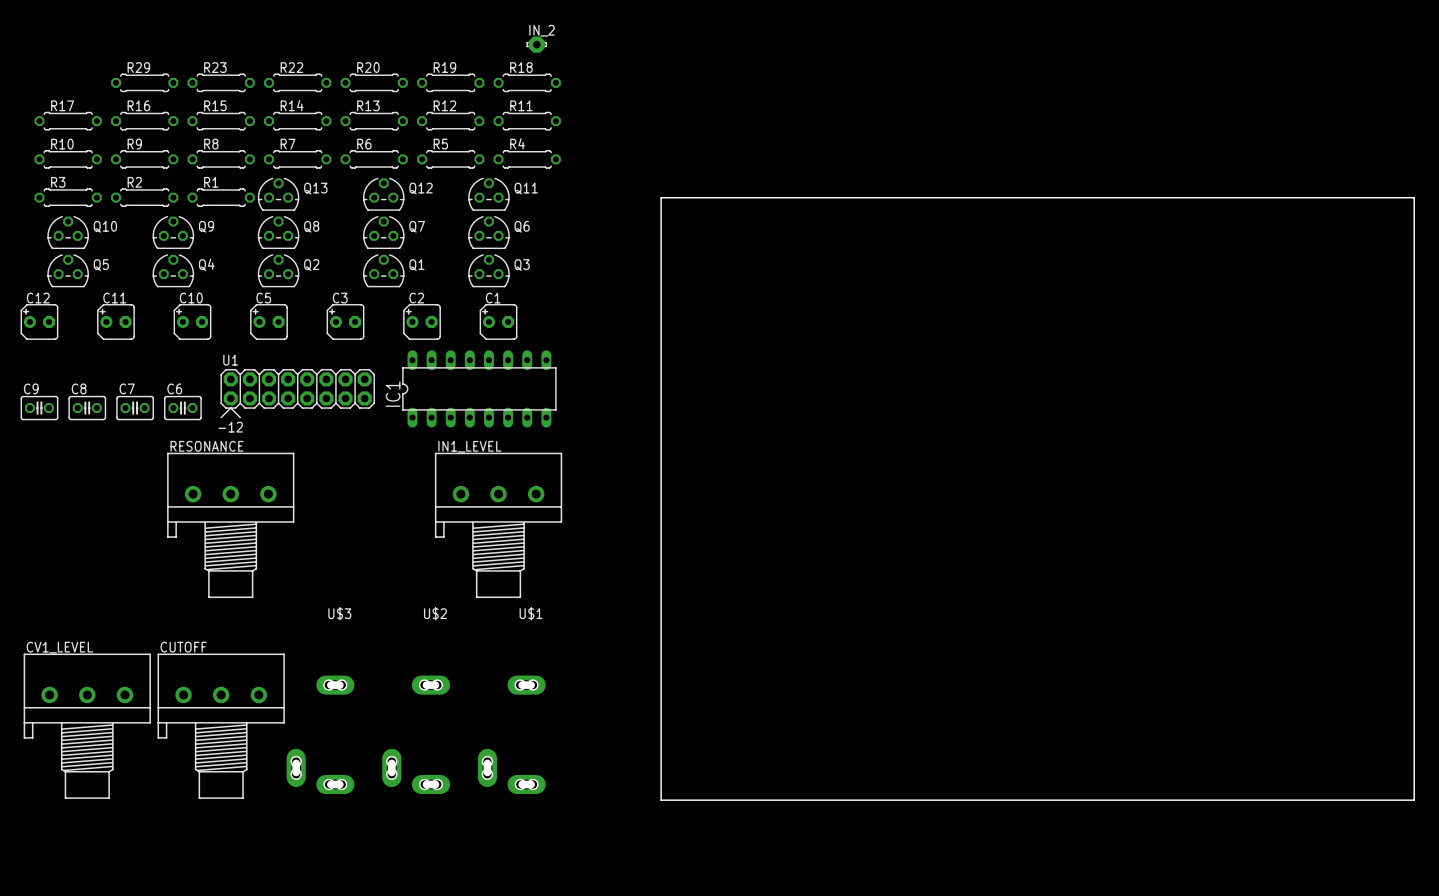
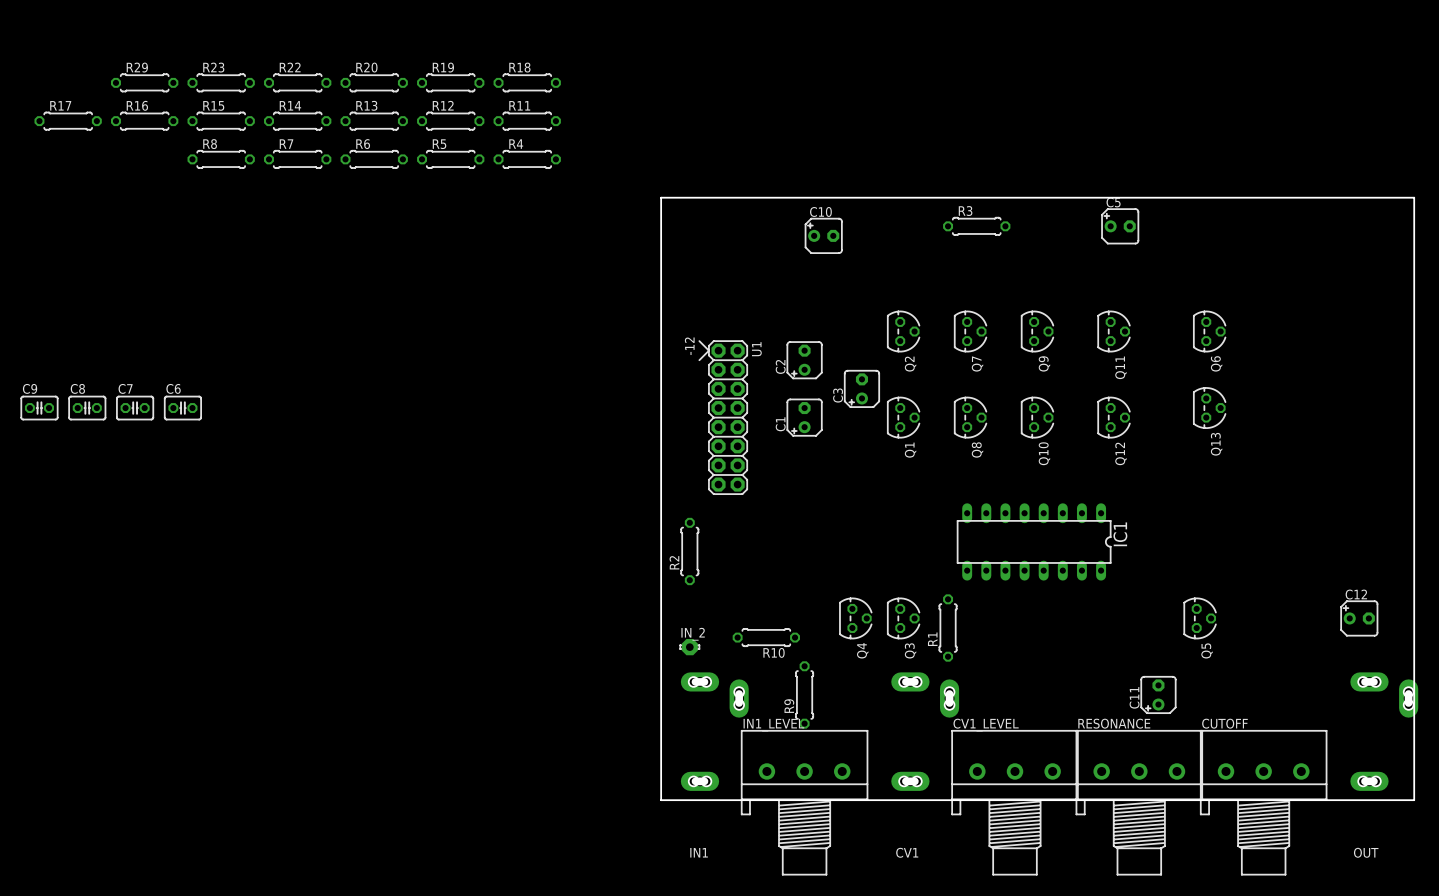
IN_2 position: (536, 44) -> (689, 647)
R10 name position: R10 (62, 144) -> R10 (774, 652)
R9 name position: R9 (134, 144) -> R9 (789, 706)
R10 position: (68, 159) -> (766, 637)
R9 rotation: 0° (144, 159) -> 90° clockwise (804, 694)
R9 position: (144, 159) -> (804, 694)
R2 name position: R2 (134, 182) -> R2 (674, 562)
R1 name position: R1 (211, 182) -> R1 (932, 639)
Q13 rotation: 0° (278, 194) -> 90° clockwise (1209, 408)
Q13 position: (278, 194) -> (1209, 408)
Q12 rotation: 0° (383, 194) -> 90° clockwise (1114, 417)
Q12 position: (383, 194) -> (1114, 417)
Q11 rotation: 0° (488, 194) -> 90° clockwise (1114, 331)
Q11 position: (488, 194) -> (1114, 331)
R3 position: (68, 197) -> (976, 226)
R2 rotation: 0° (144, 197) -> 90° clockwise (689, 551)
R2 position: (144, 197) -> (689, 551)
R1 rotation: 0° (221, 197) -> 90° clockwise (948, 628)
R1 position: (221, 197) -> (948, 628)
Q10 rotation: 0° (68, 232) -> 90° clockwise (1037, 417)
Q10 position: (68, 232) -> (1037, 417)
Q9 rotation: 0° (173, 232) -> 90° clockwise (1037, 331)
Q9 position: (173, 232) -> (1037, 331)
Q8 rotation: 0° (278, 232) -> 90° clockwise (970, 417)
Q8 position: (278, 232) -> (970, 417)
Q7 rotation: 0° (383, 232) -> 90° clockwise (970, 331)
Q7 position: (383, 232) -> (970, 331)
Q6 rotation: 0° (488, 232) -> 90° clockwise (1209, 331)
Q6 position: (488, 232) -> (1209, 331)
Q5 rotation: 0° (68, 270) -> 90° clockwise (1200, 618)
Q5 position: (68, 270) -> (1200, 618)
Q4 rotation: 0° (173, 270) -> 90° clockwise (855, 618)
Q4 position: (173, 270) -> (855, 618)
Q2 rotation: 0° (278, 270) -> 90° clockwise (903, 331)
Q2 position: (278, 270) -> (903, 331)
Q1 rotation: 0° (383, 270) -> 90° clockwise (903, 417)
Q1 position: (383, 270) -> (903, 417)
Q3 rotation: 0° (488, 270) -> 90° clockwise (903, 618)
Q3 position: (488, 270) -> (903, 618)
C12 position: (39, 321) -> (1359, 618)
C11 rotation: 0° (115, 321) -> 90° counterclockwise (1158, 694)
C11 position: (115, 321) -> (1158, 694)
C10 position: (192, 321) -> (823, 235)
C5 position: (269, 321) -> (1120, 226)
C3 rotation: 0° (345, 321) -> 90° counterclockwise (861, 388)
C3 position: (345, 321) -> (861, 388)
C2 rotation: 0° (422, 321) -> 90° counterclockwise (804, 360)
C2 position: (422, 321) -> (804, 360)
C1 rotation: 0° (498, 321) -> 90° counterclockwise (804, 417)
C1 position: (498, 321) -> (804, 417)
U1 name position: U1 (230, 360) -> U1 (756, 349)
U1 footprint: [220, 369, 375, 419] -> [698, 340, 748, 495]
IC1 rotation: 0° (479, 388) -> 180° (1034, 541)
IC1 position: (479, 388) -> (1034, 541)
RESONANCE: (230, 525) -> none
IN1_LEVEL position: (498, 525) -> (804, 802)
CV1_LEVEL position: (87, 726) -> (1015, 802)
CUTOFF: (221, 726) -> none
IN1: none -> (714, 731)
CV1: none -> (925, 731)
OUT: none -> (1384, 731)
U$3: (320, 734) -> none
U$2: (416, 734) -> none
U$1: (511, 734) -> none
RESONANCE: none -> (1139, 802)
CUTOFF: none -> (1263, 802)

